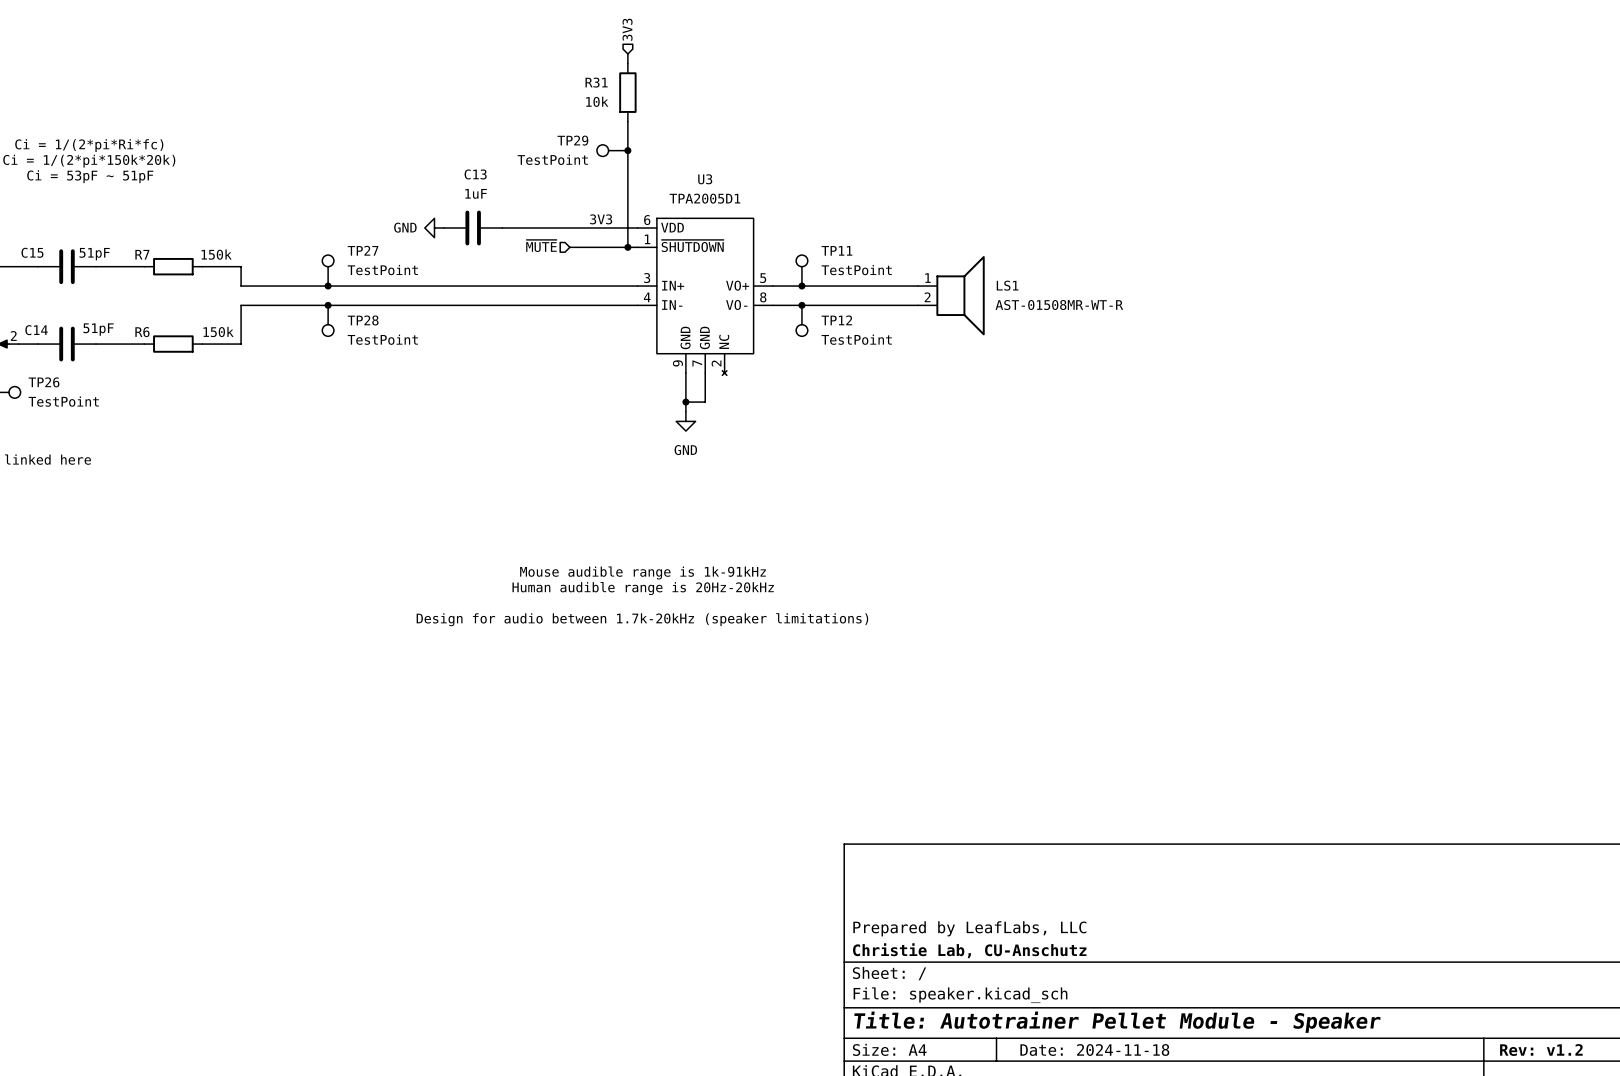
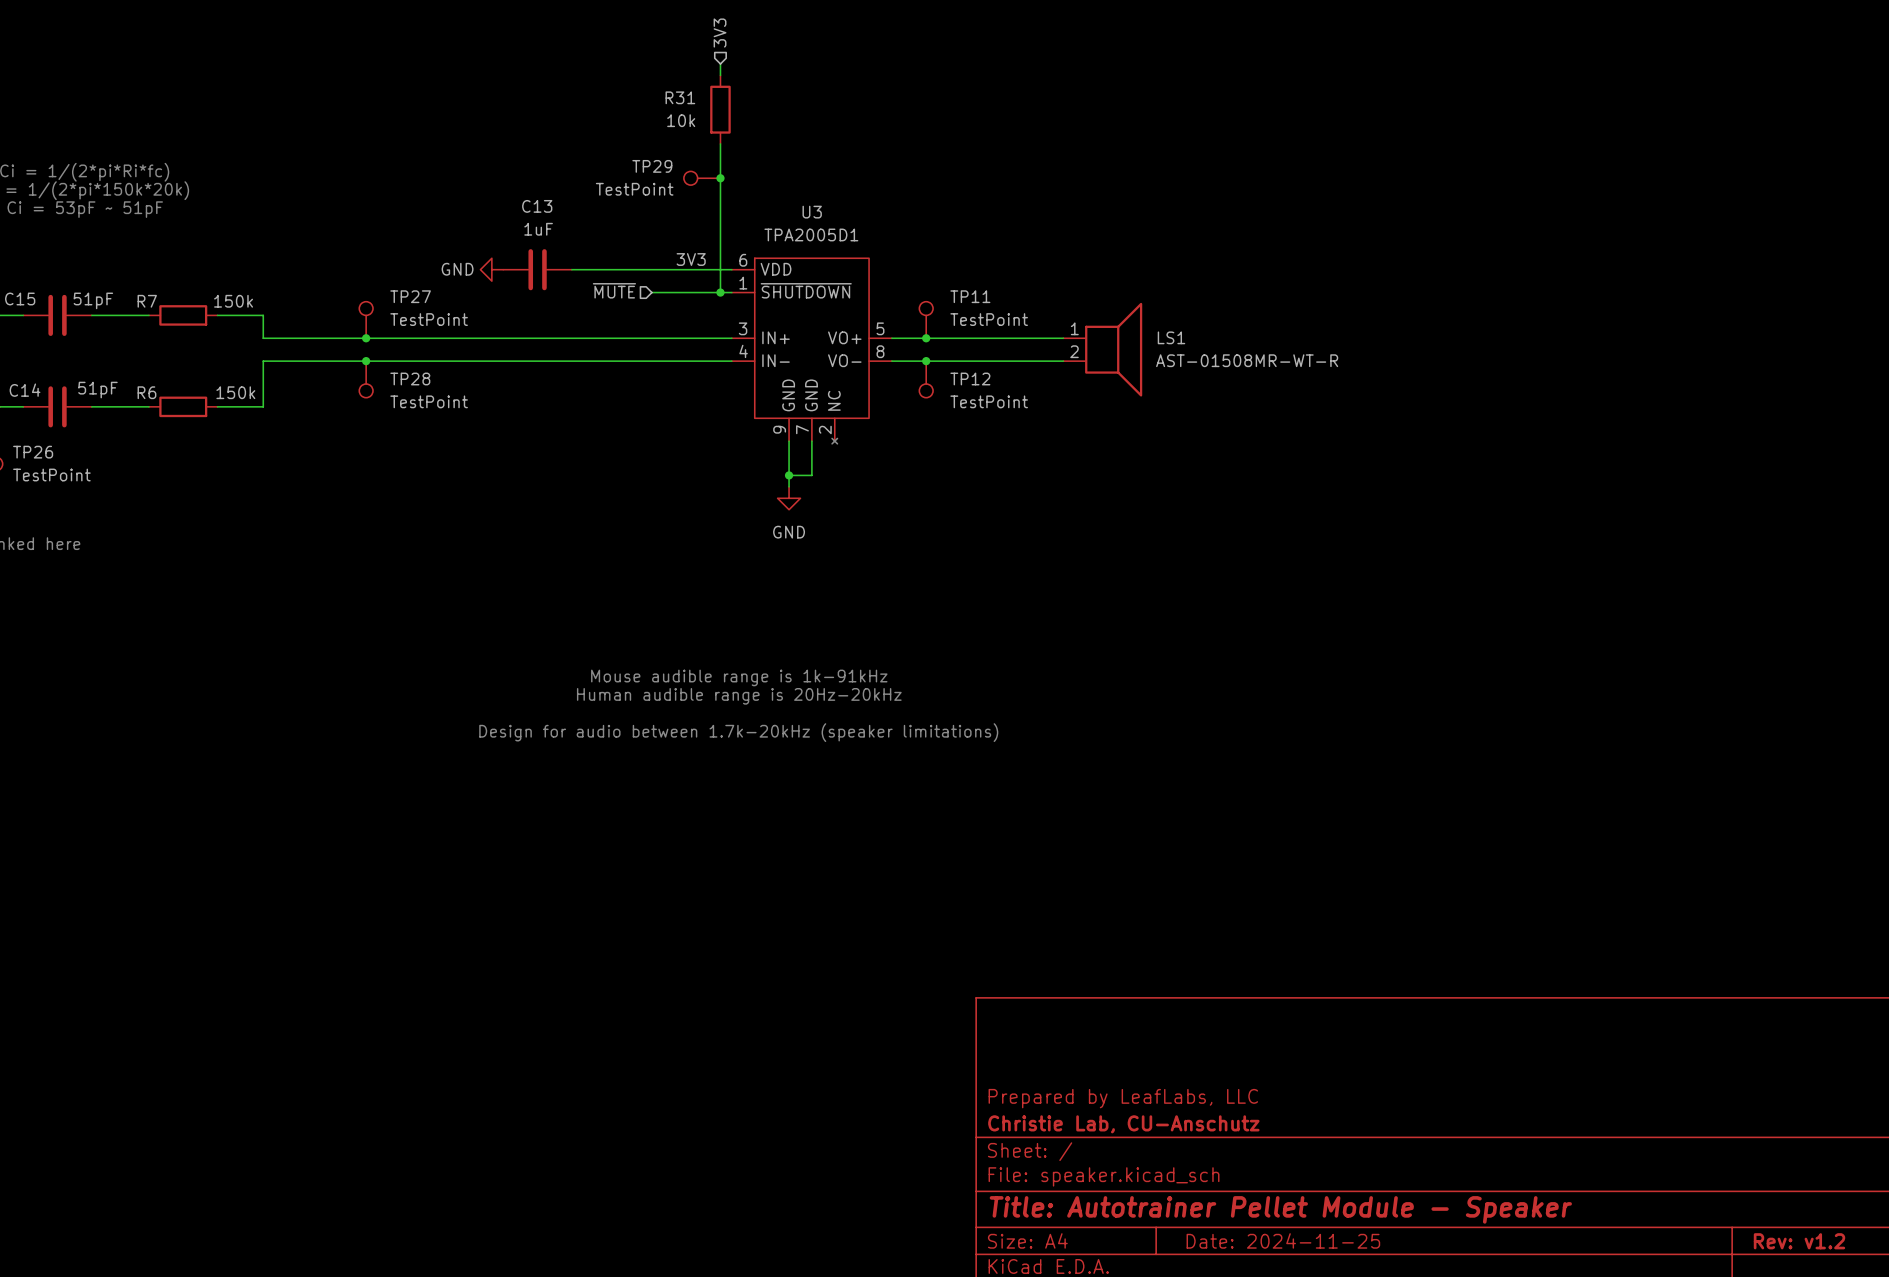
title block: Date: 2024-11-18 (1094, 1050) -> Date: 2024-11-25 (1283, 1240)

